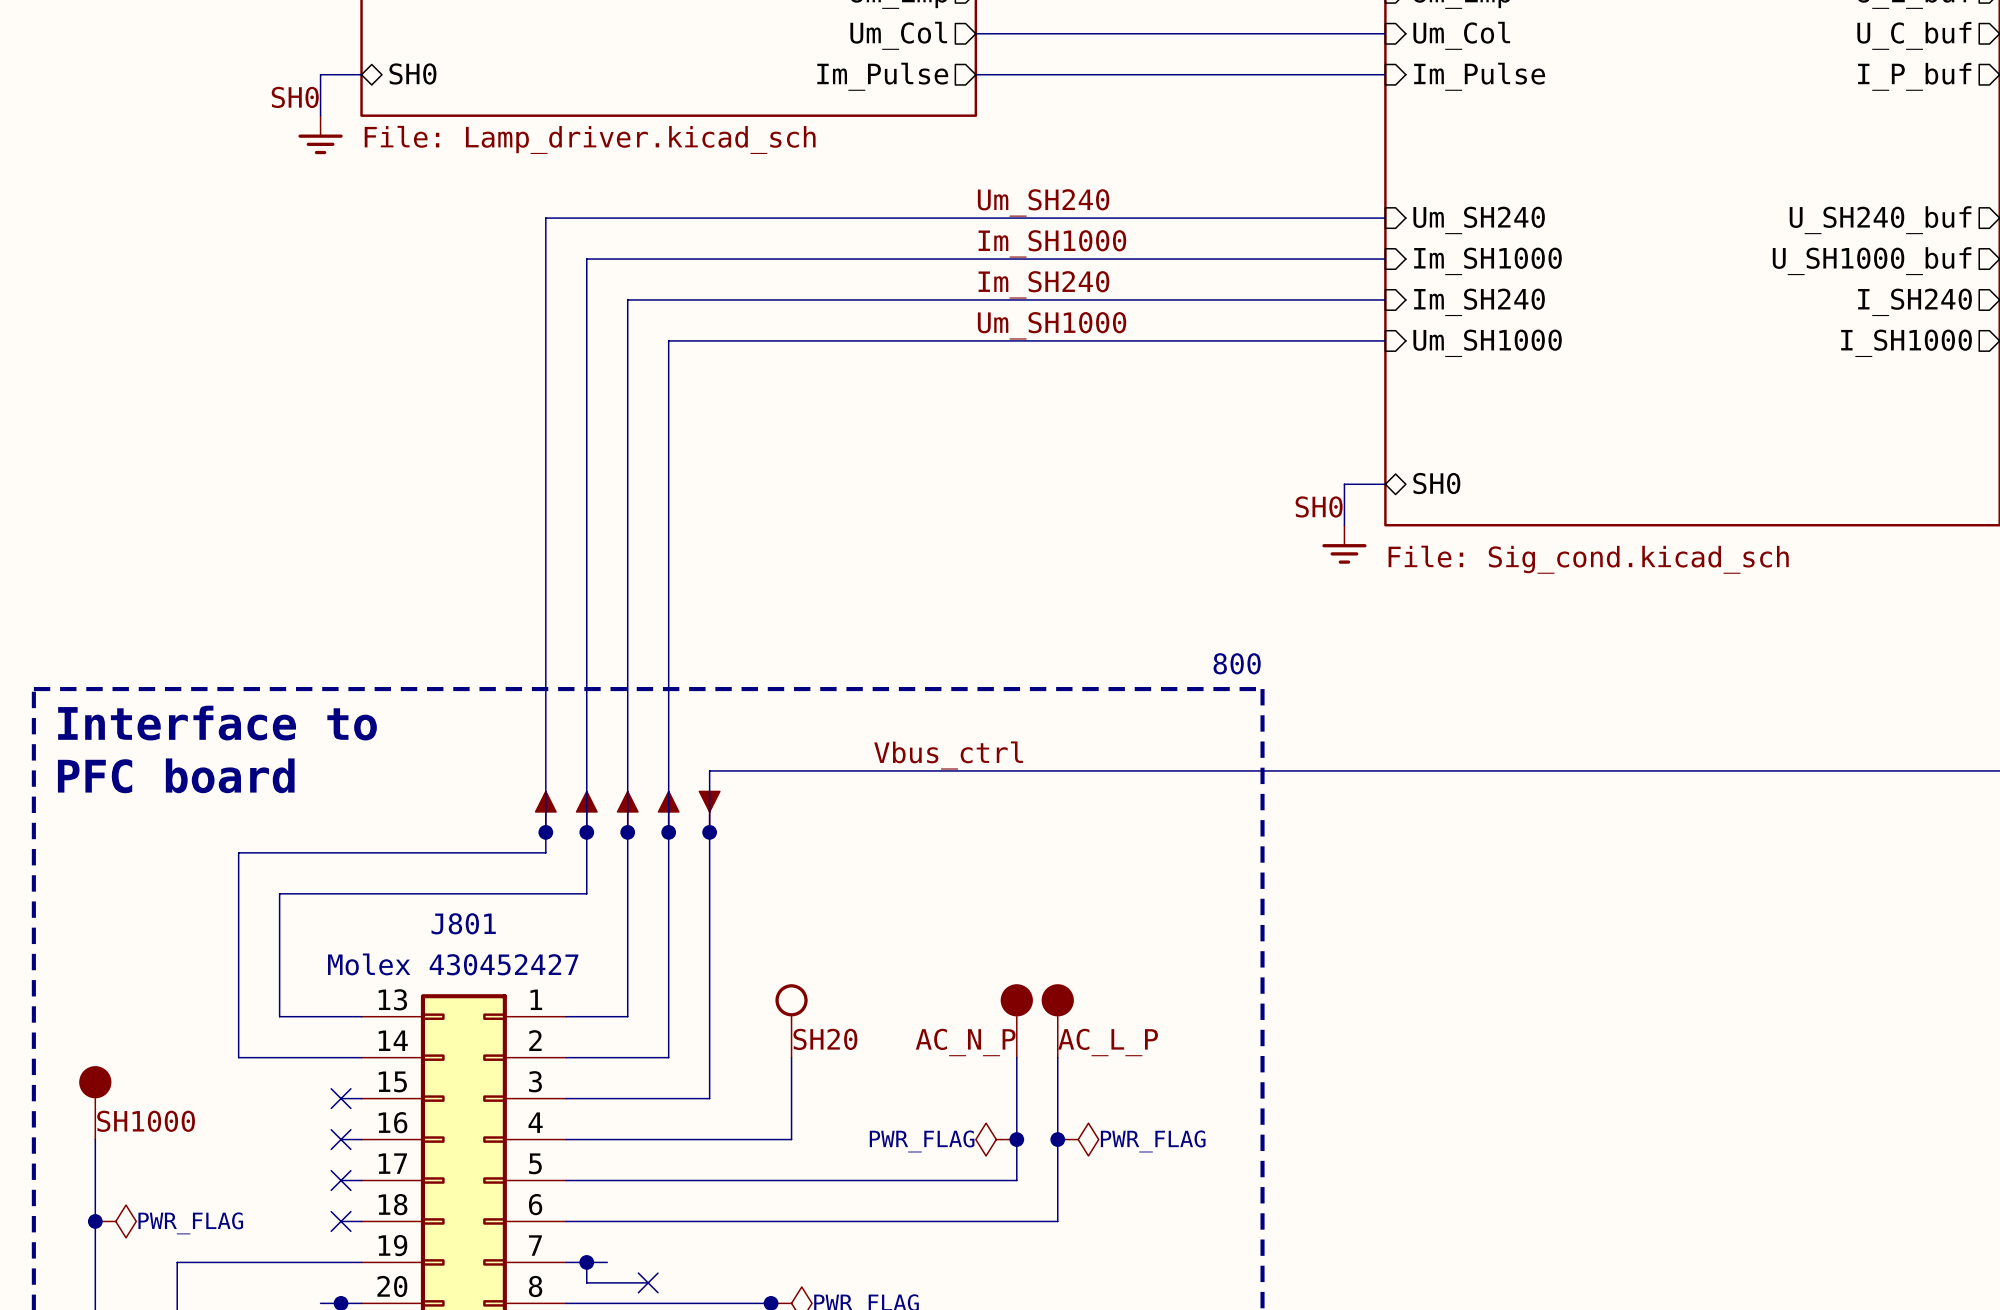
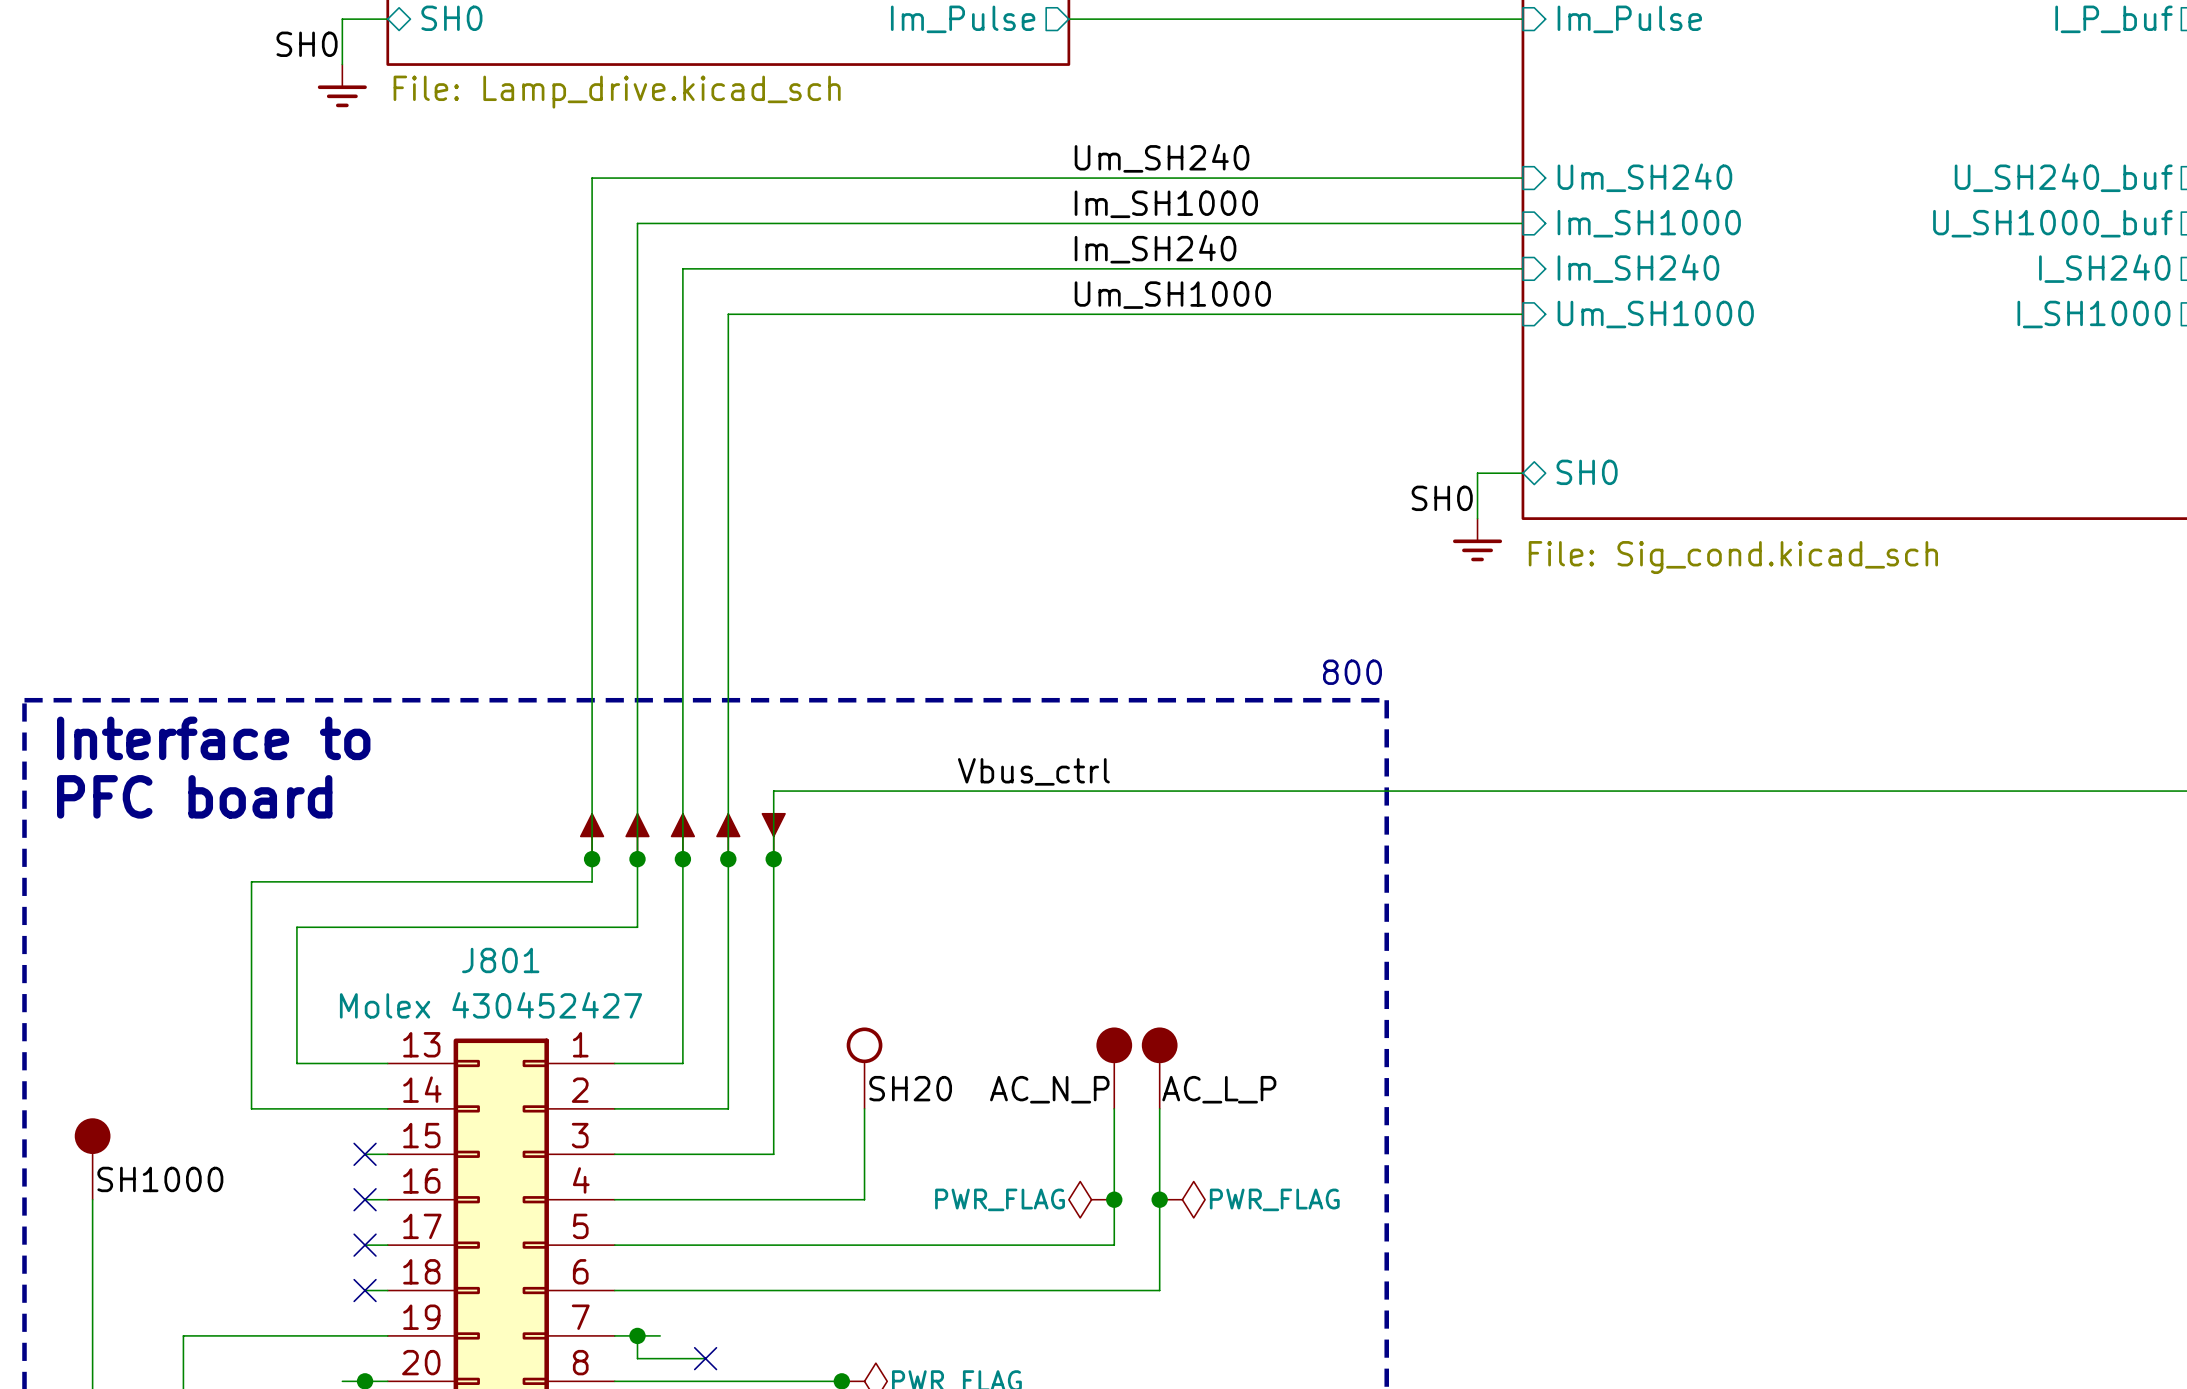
sheet value: File: Lamp_driver.kicad_sch (590, 139) -> File: Lamp_drive.kicad_sch (617, 92)
junction: (95, 1221) -> none
power symbol: PWR_FLAG (115, 1221) -> none

